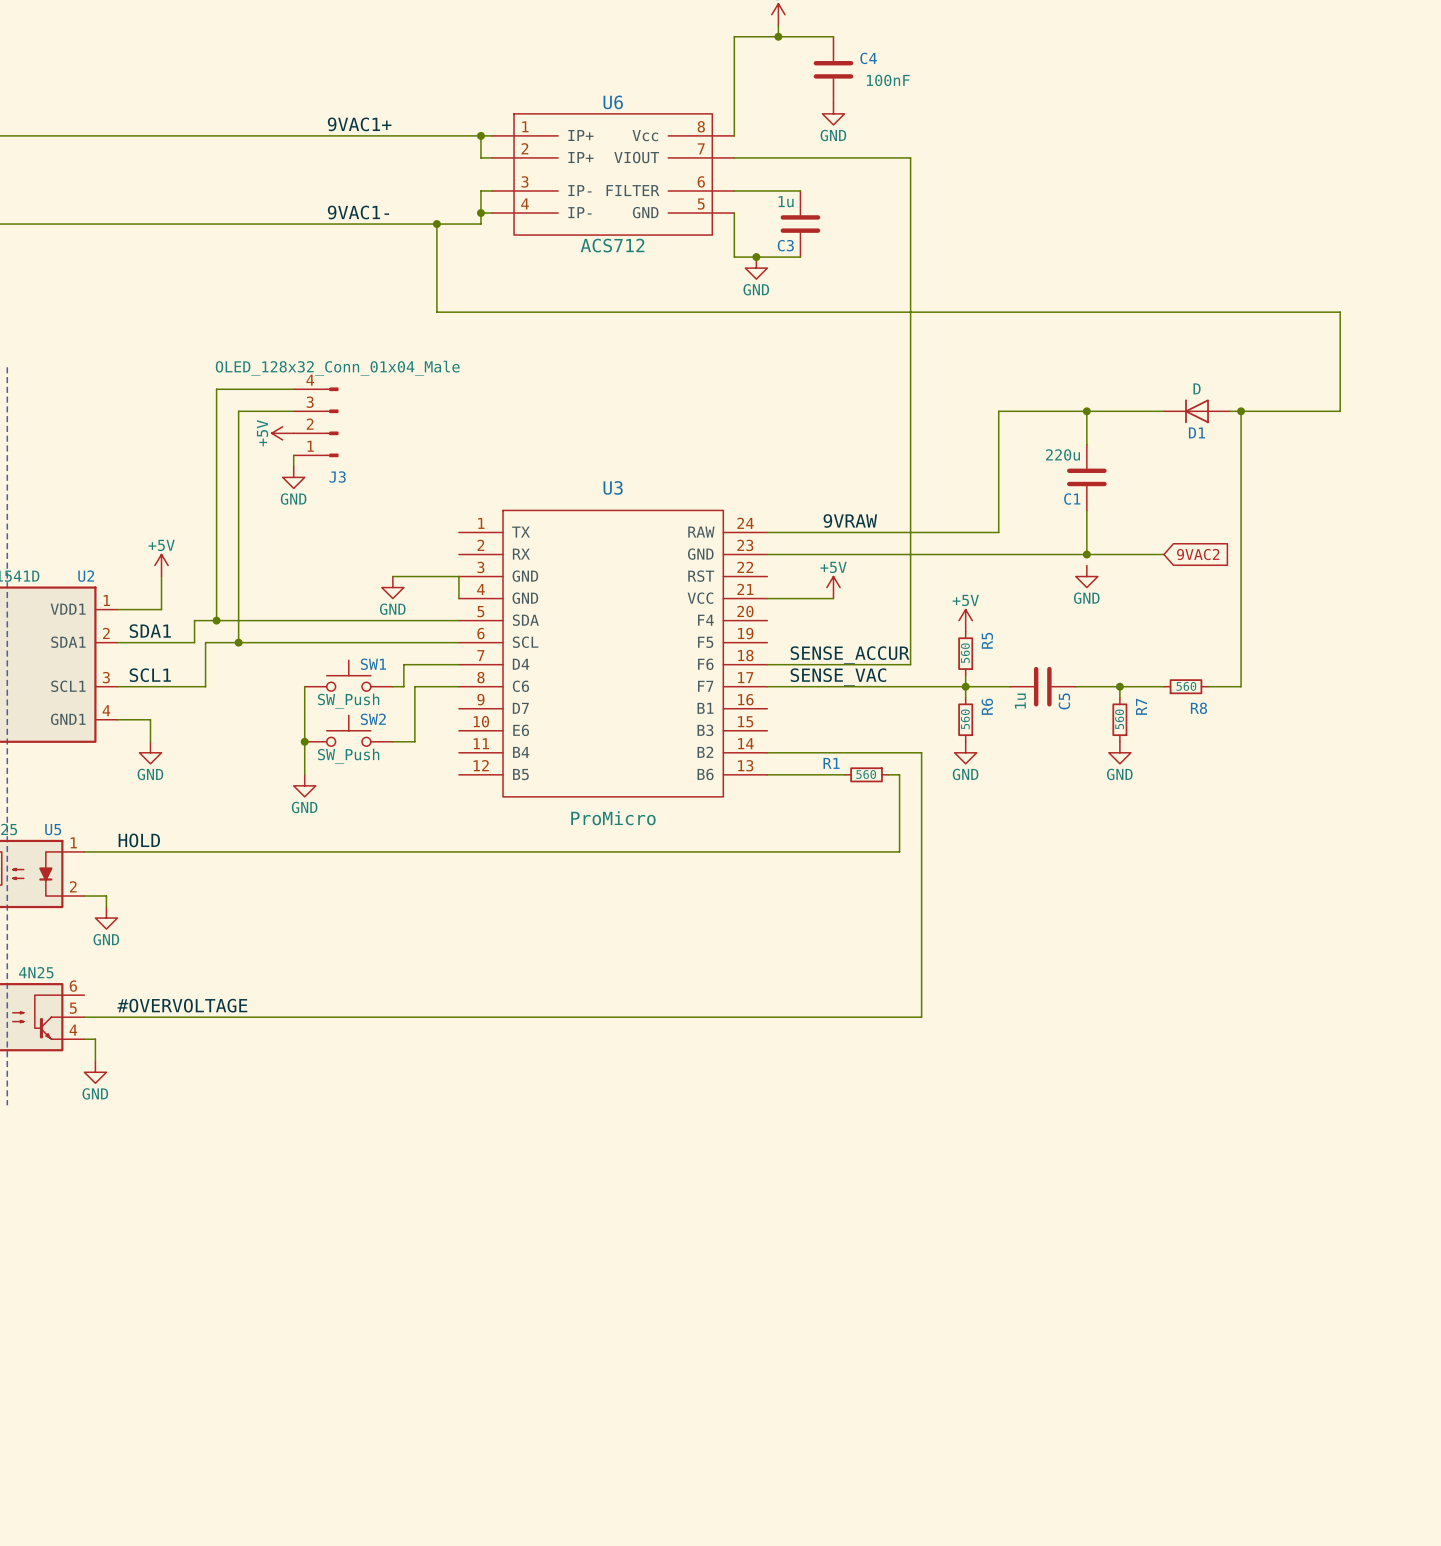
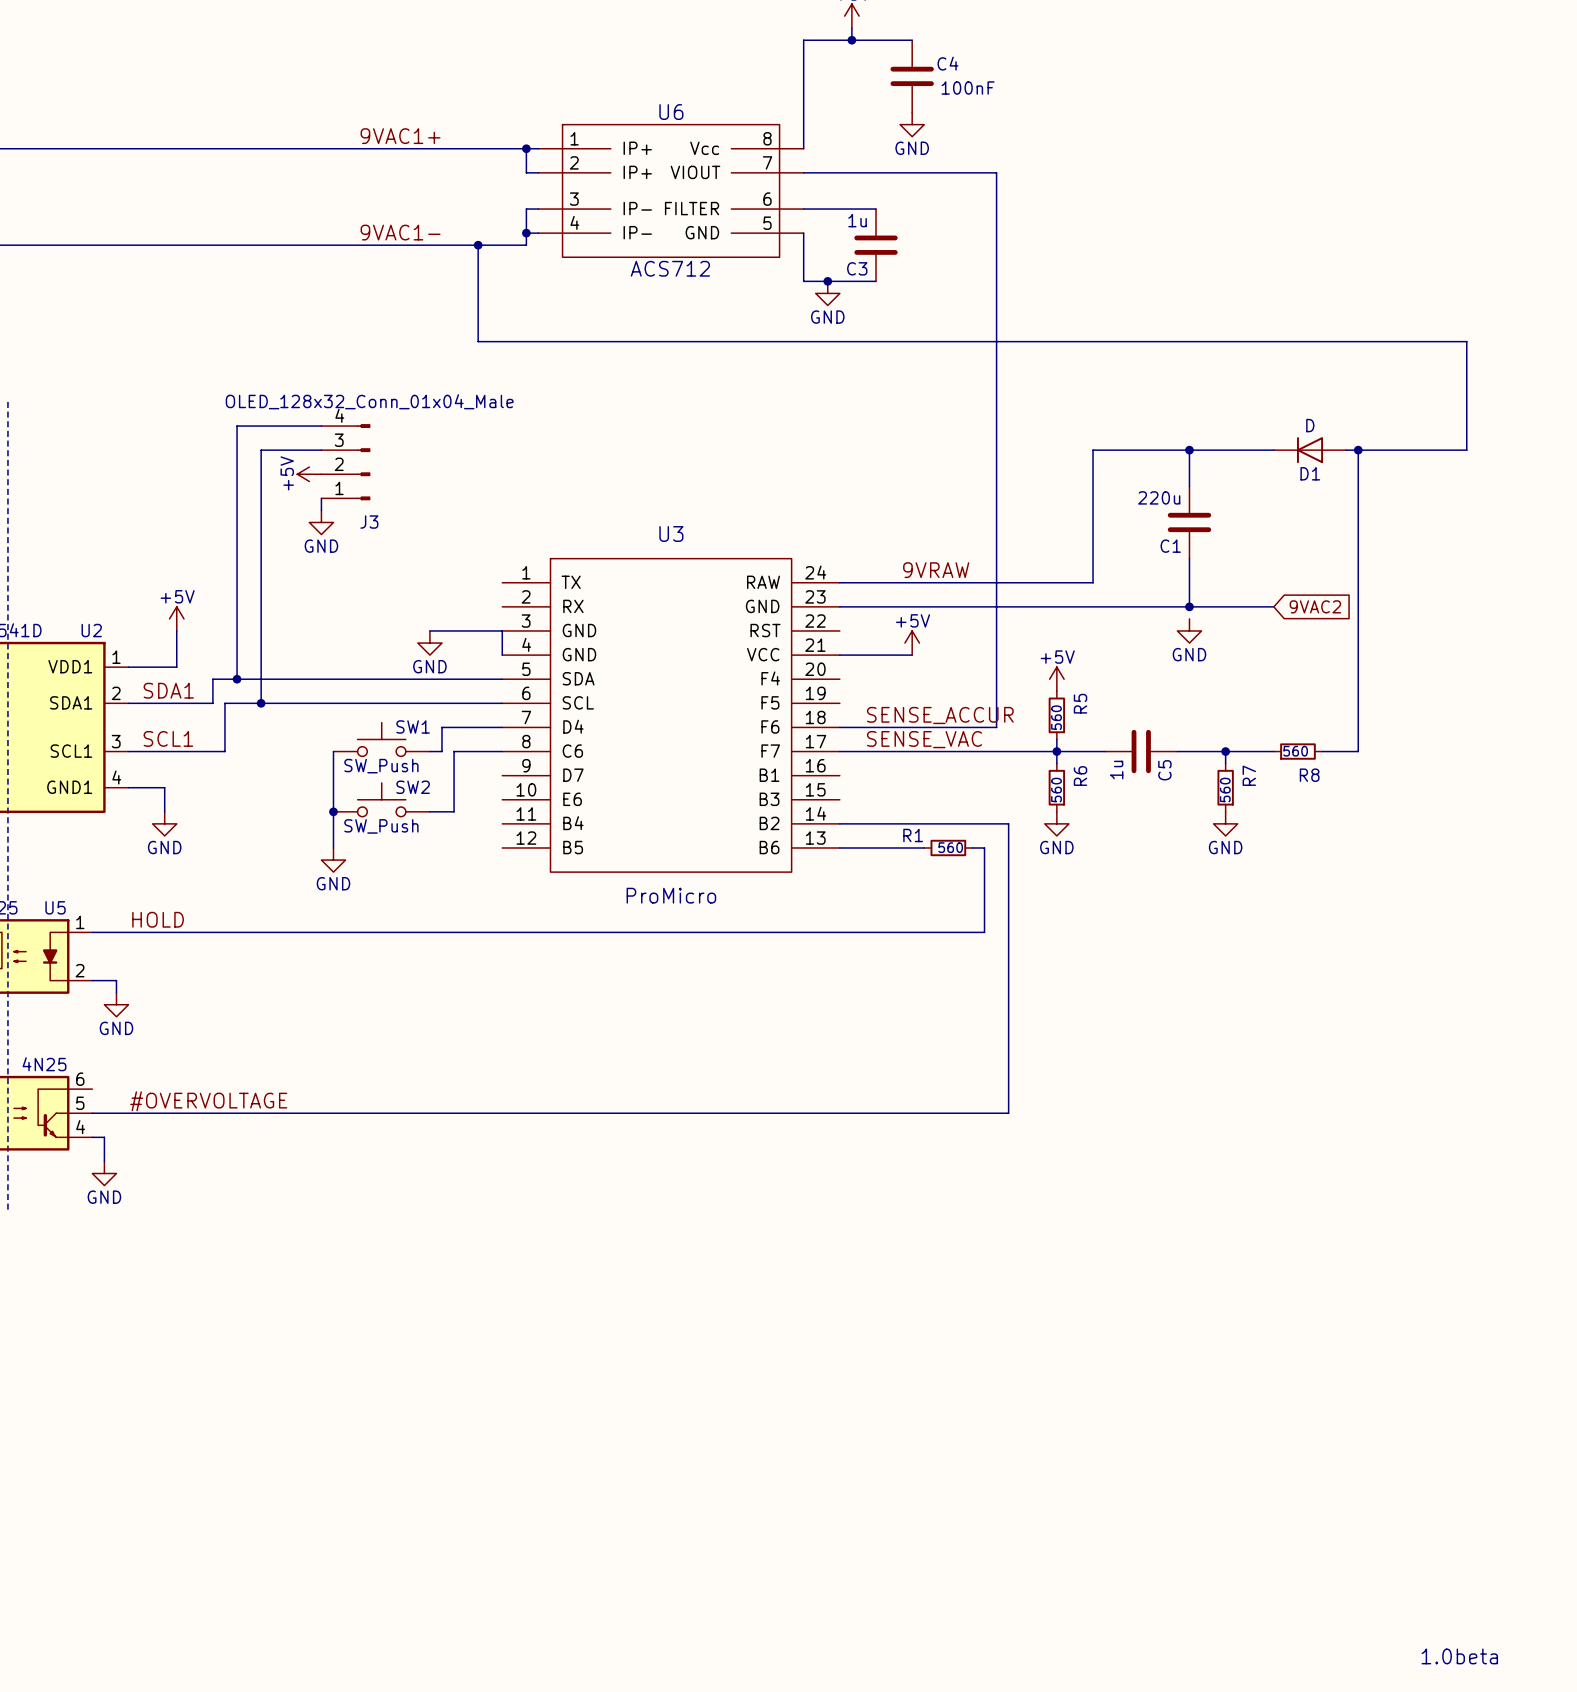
text: none -> 1.0beta (1459, 1656)

